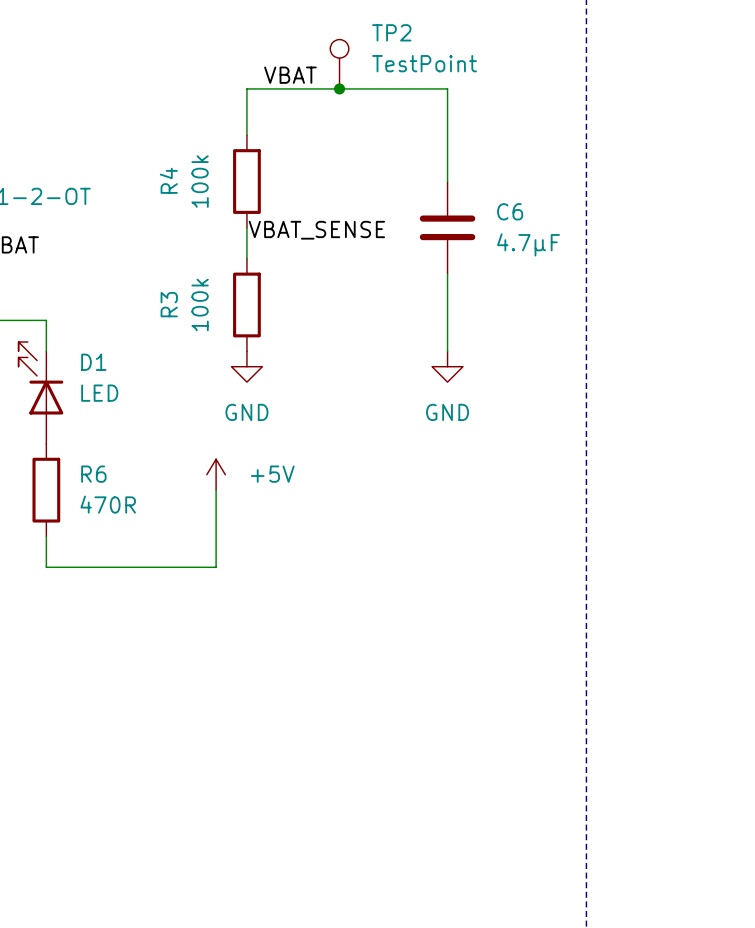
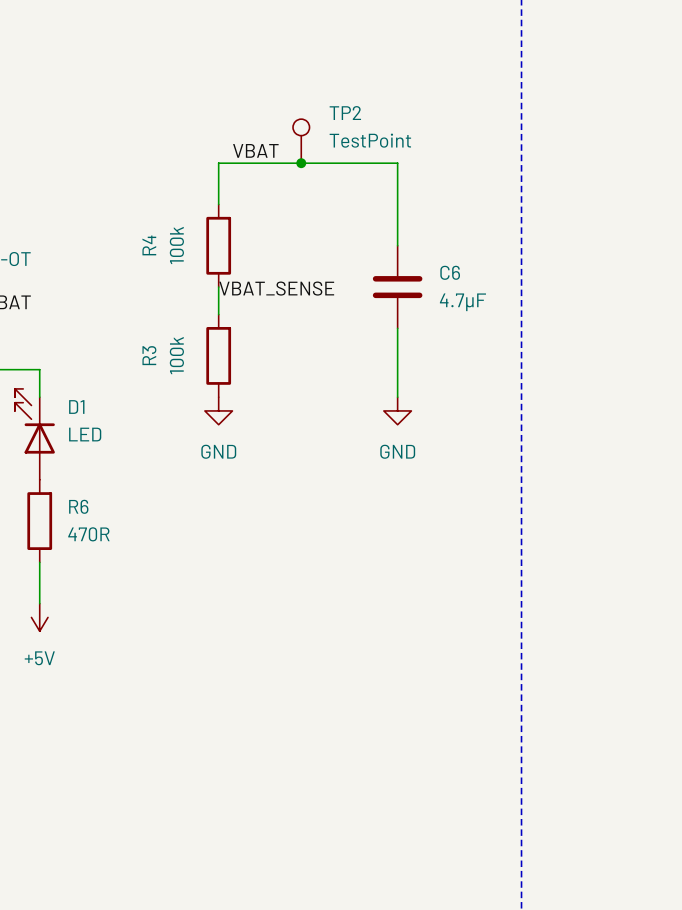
power symbol rotation: 0° (216, 474) -> 180° (39, 617)
power symbol position: +5V (216, 474) -> +5V (39, 617)
power symbol text position: +5V (272, 474) -> +5V (39, 658)
wire: (216, 490) (216, 567) (46, 567) -> (39, 603) (39, 589)

